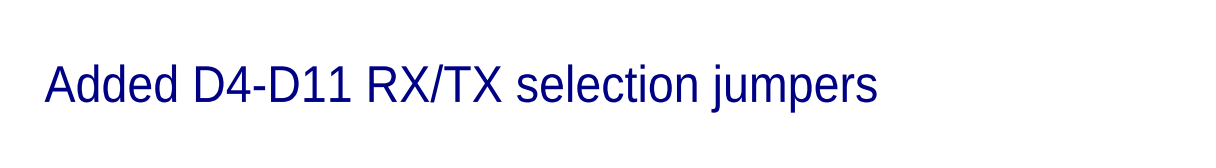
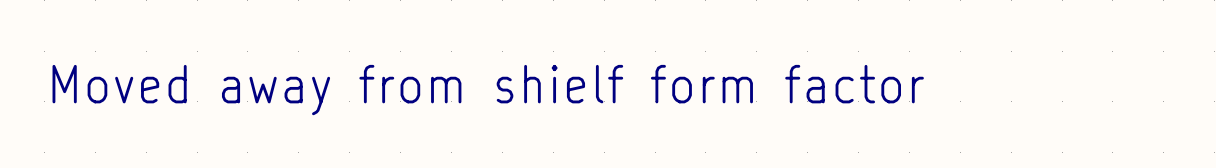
text: Added D4-D11 RX/TX selection jumpers (460, 88) -> Moved away from shielf form factor (488, 90)

